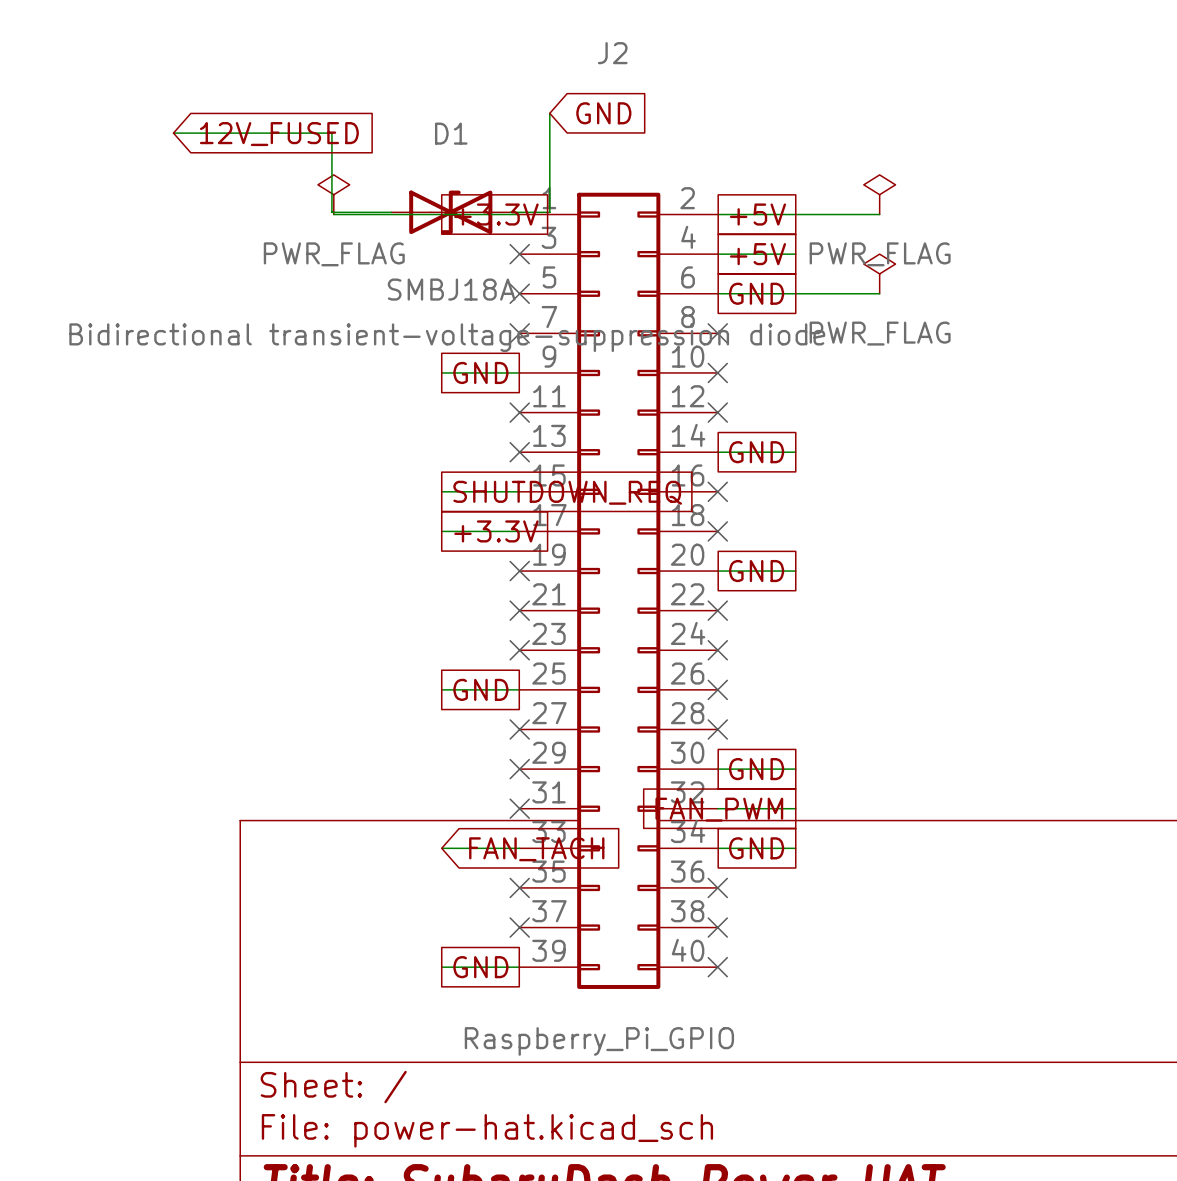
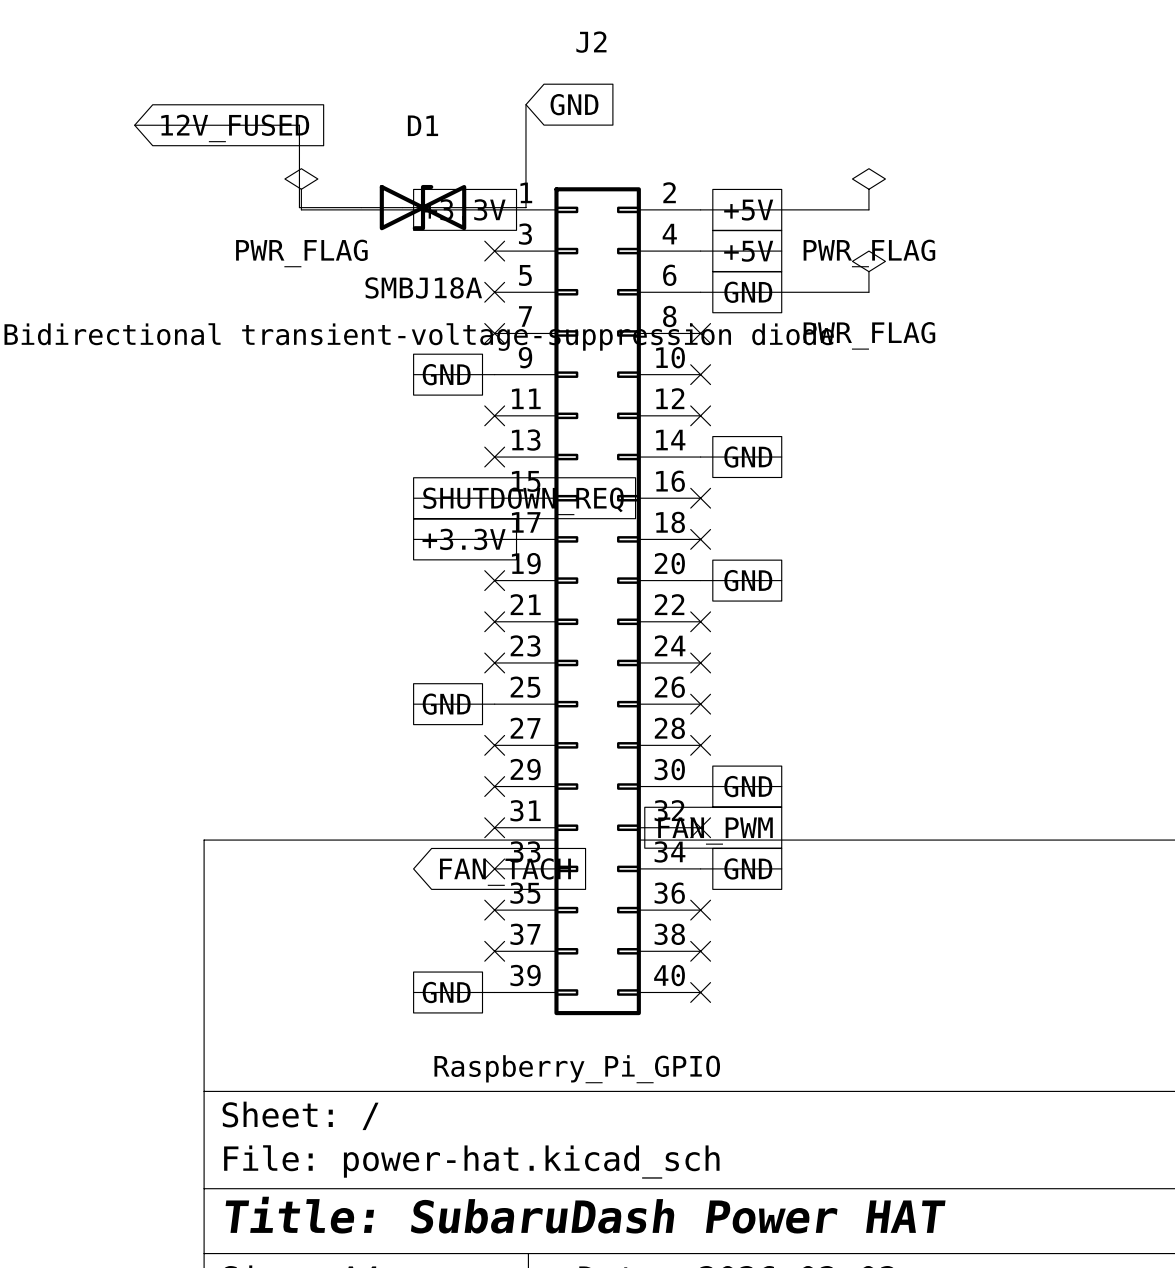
wire: (717, 808) (795, 808) -> none
no-connect mark: none -> (700, 827)
wire: (441, 848) (519, 848) -> none
no-connect mark: none -> (494, 868)

